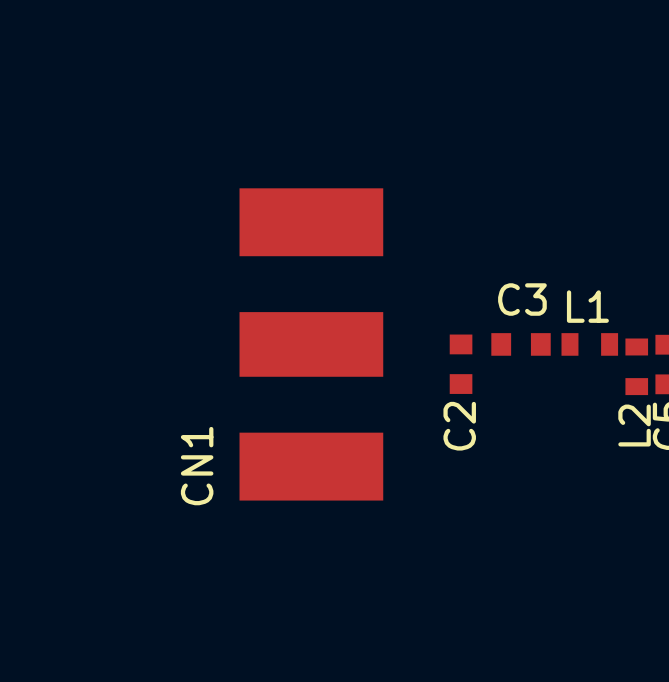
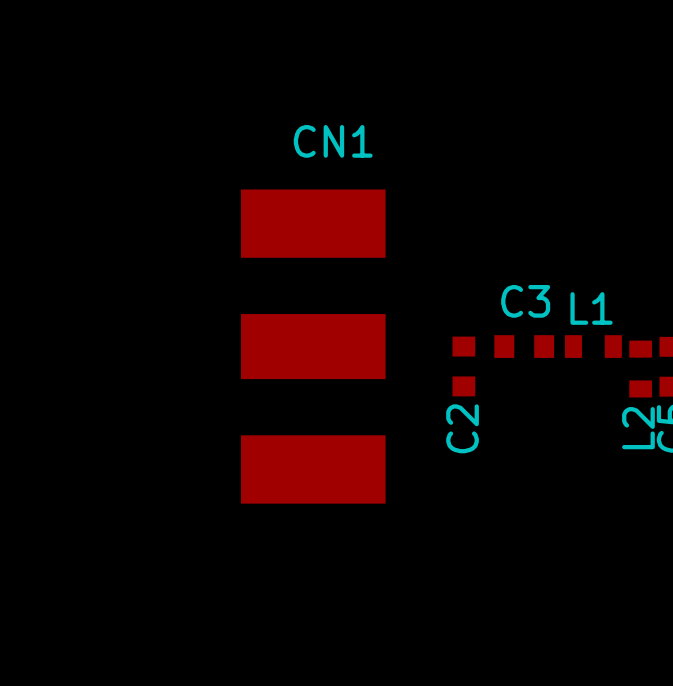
CN1 name rotation: 0° (197, 466) -> 90° clockwise (333, 141)
CN1 name position: CN1 (197, 466) -> CN1 (333, 141)

